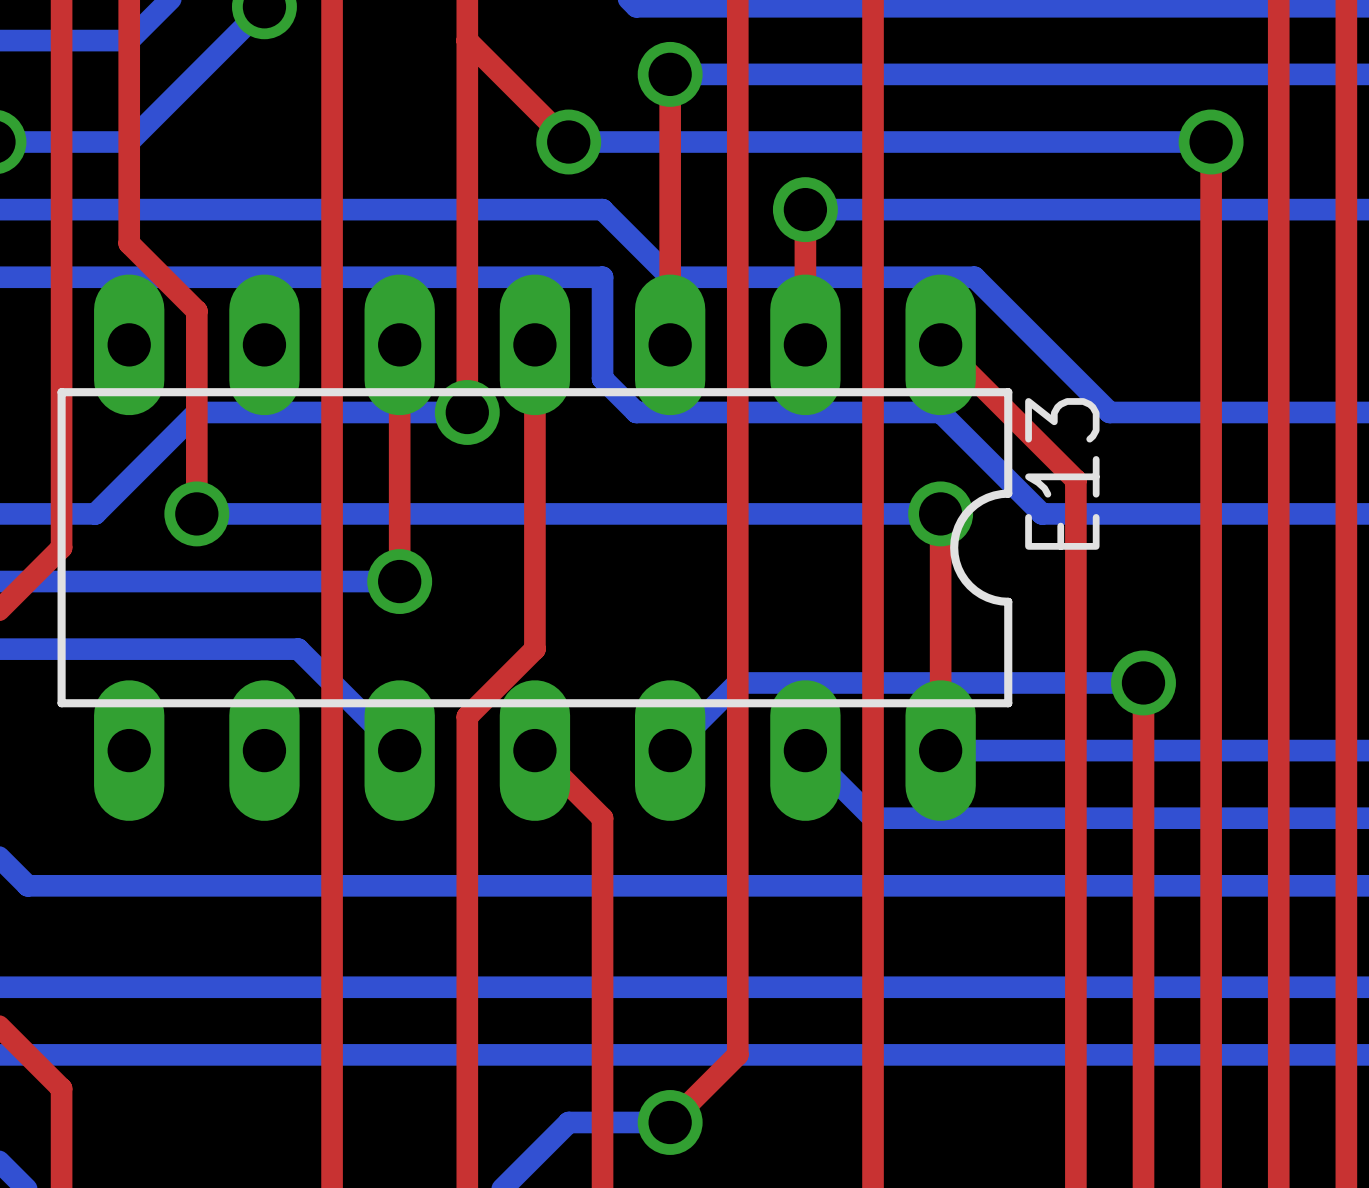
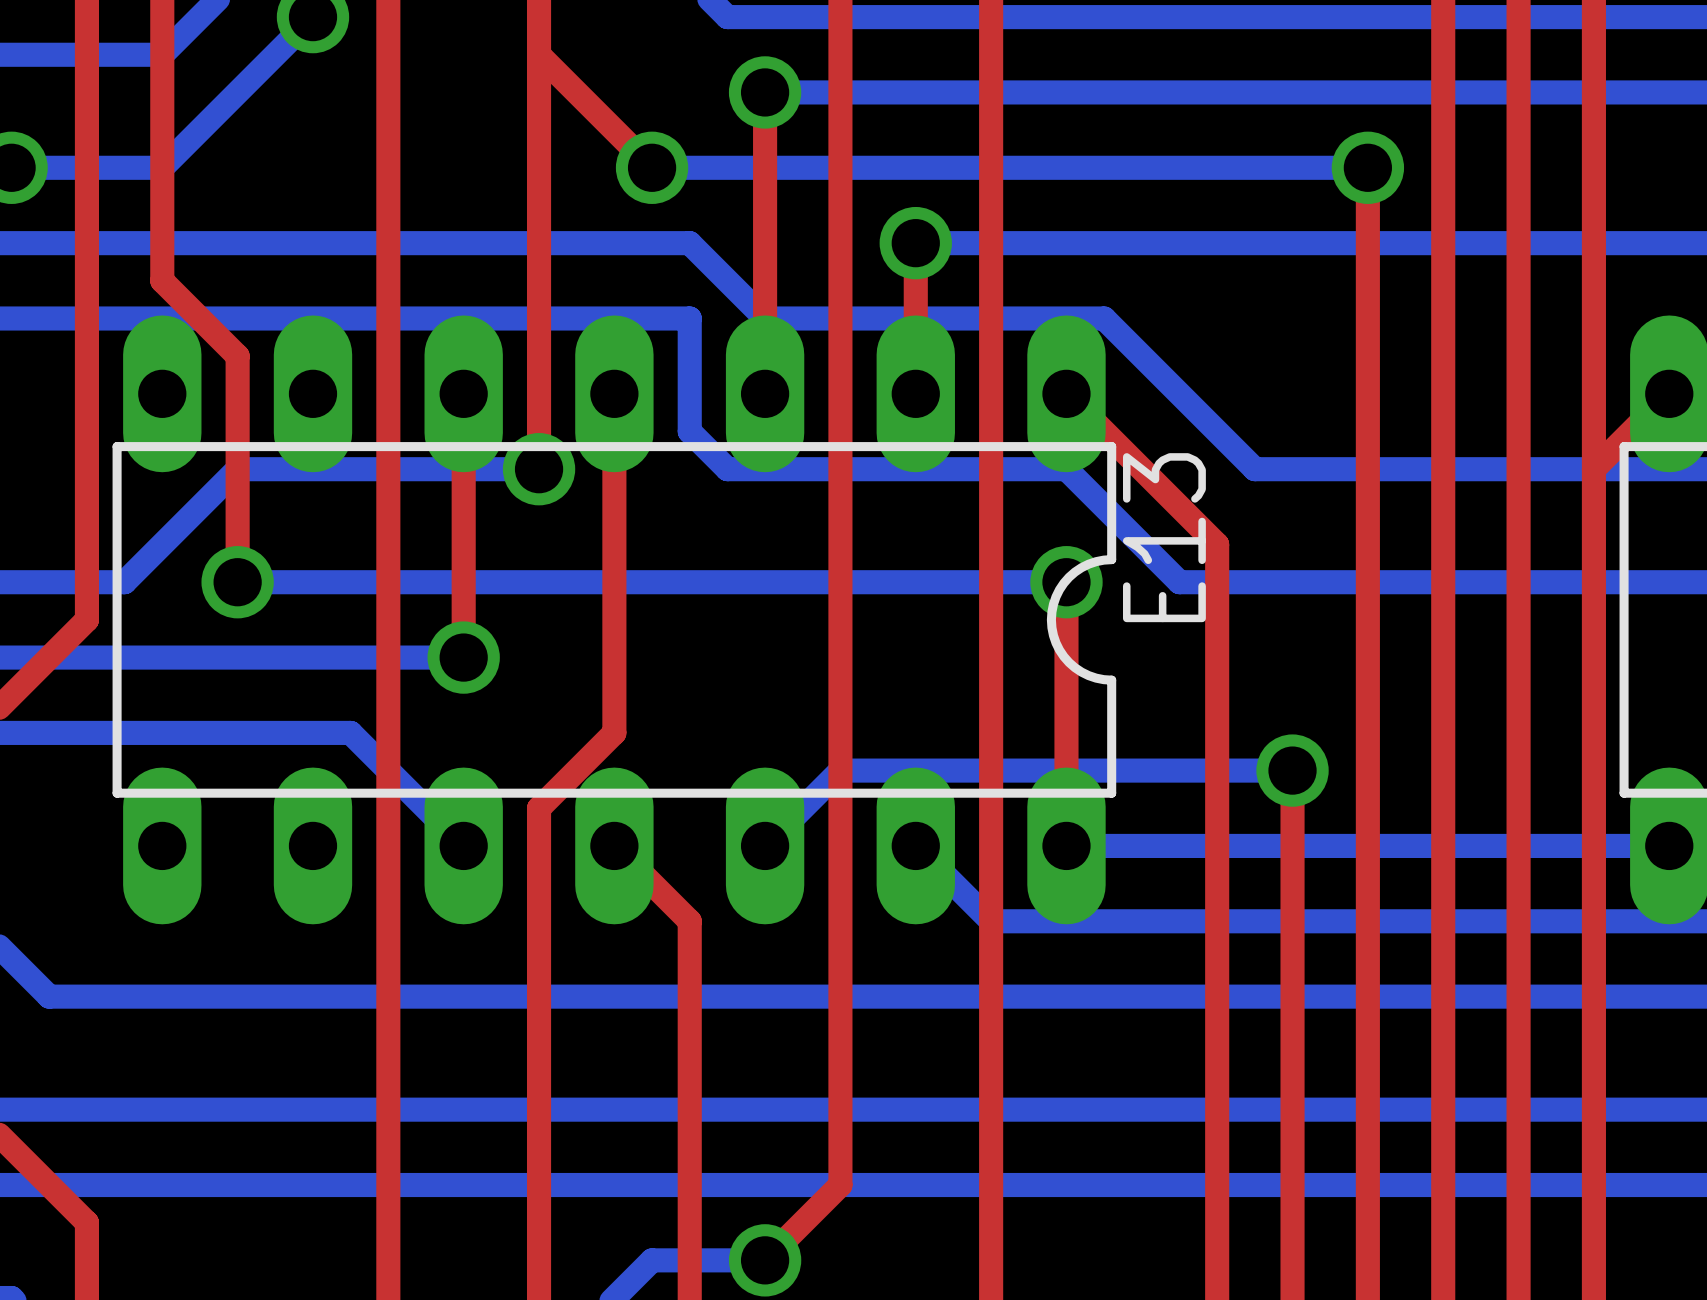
E13 footprint: [57, 274, 1013, 821] -> [112, 315, 1117, 925]
E13 name position: E13 (1062, 473) -> E13 (1164, 537)

